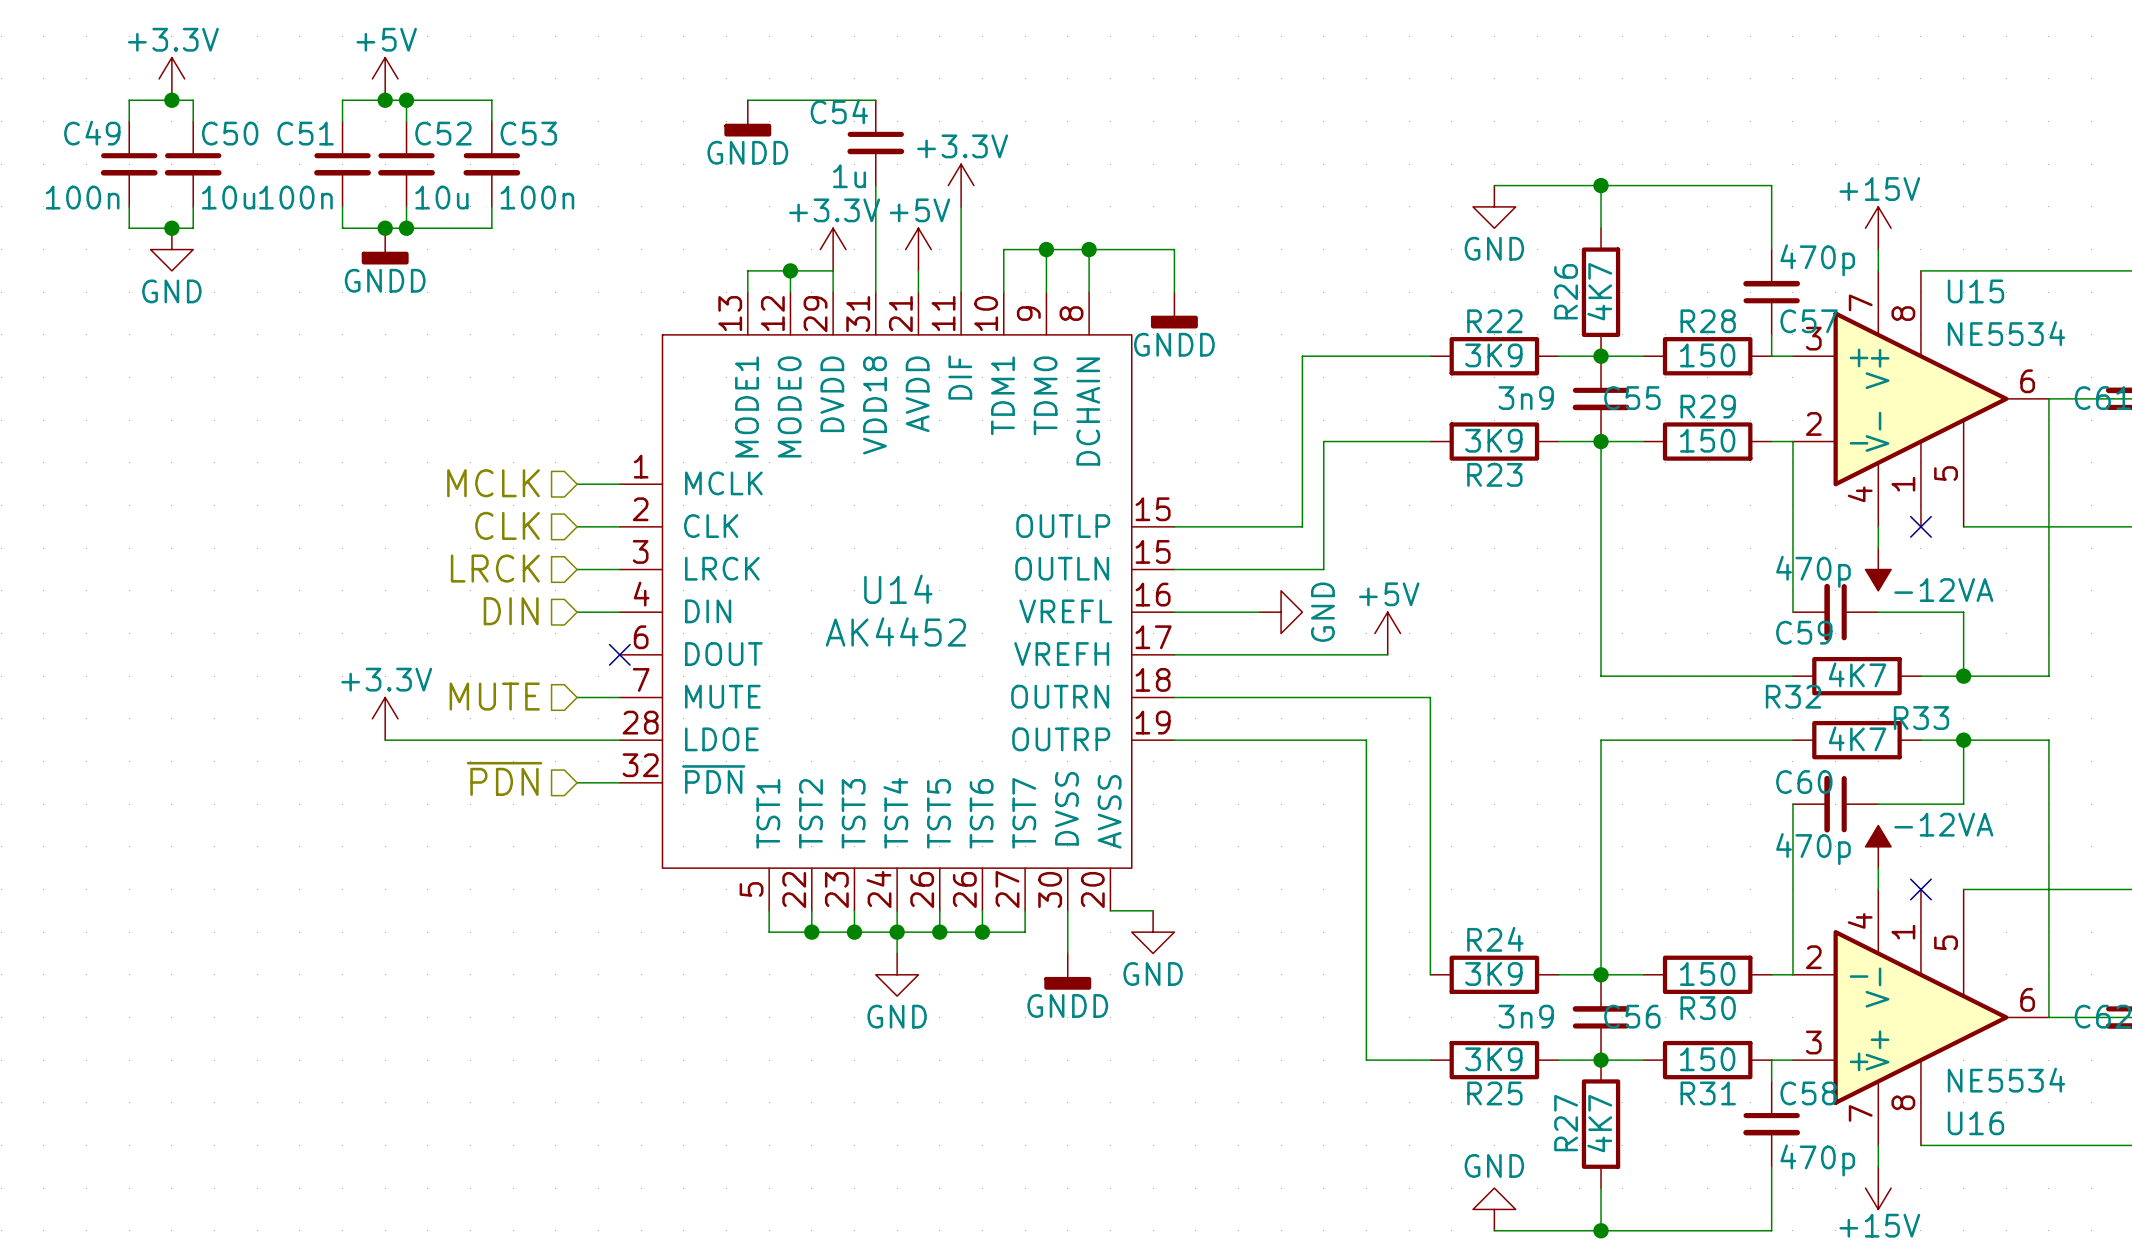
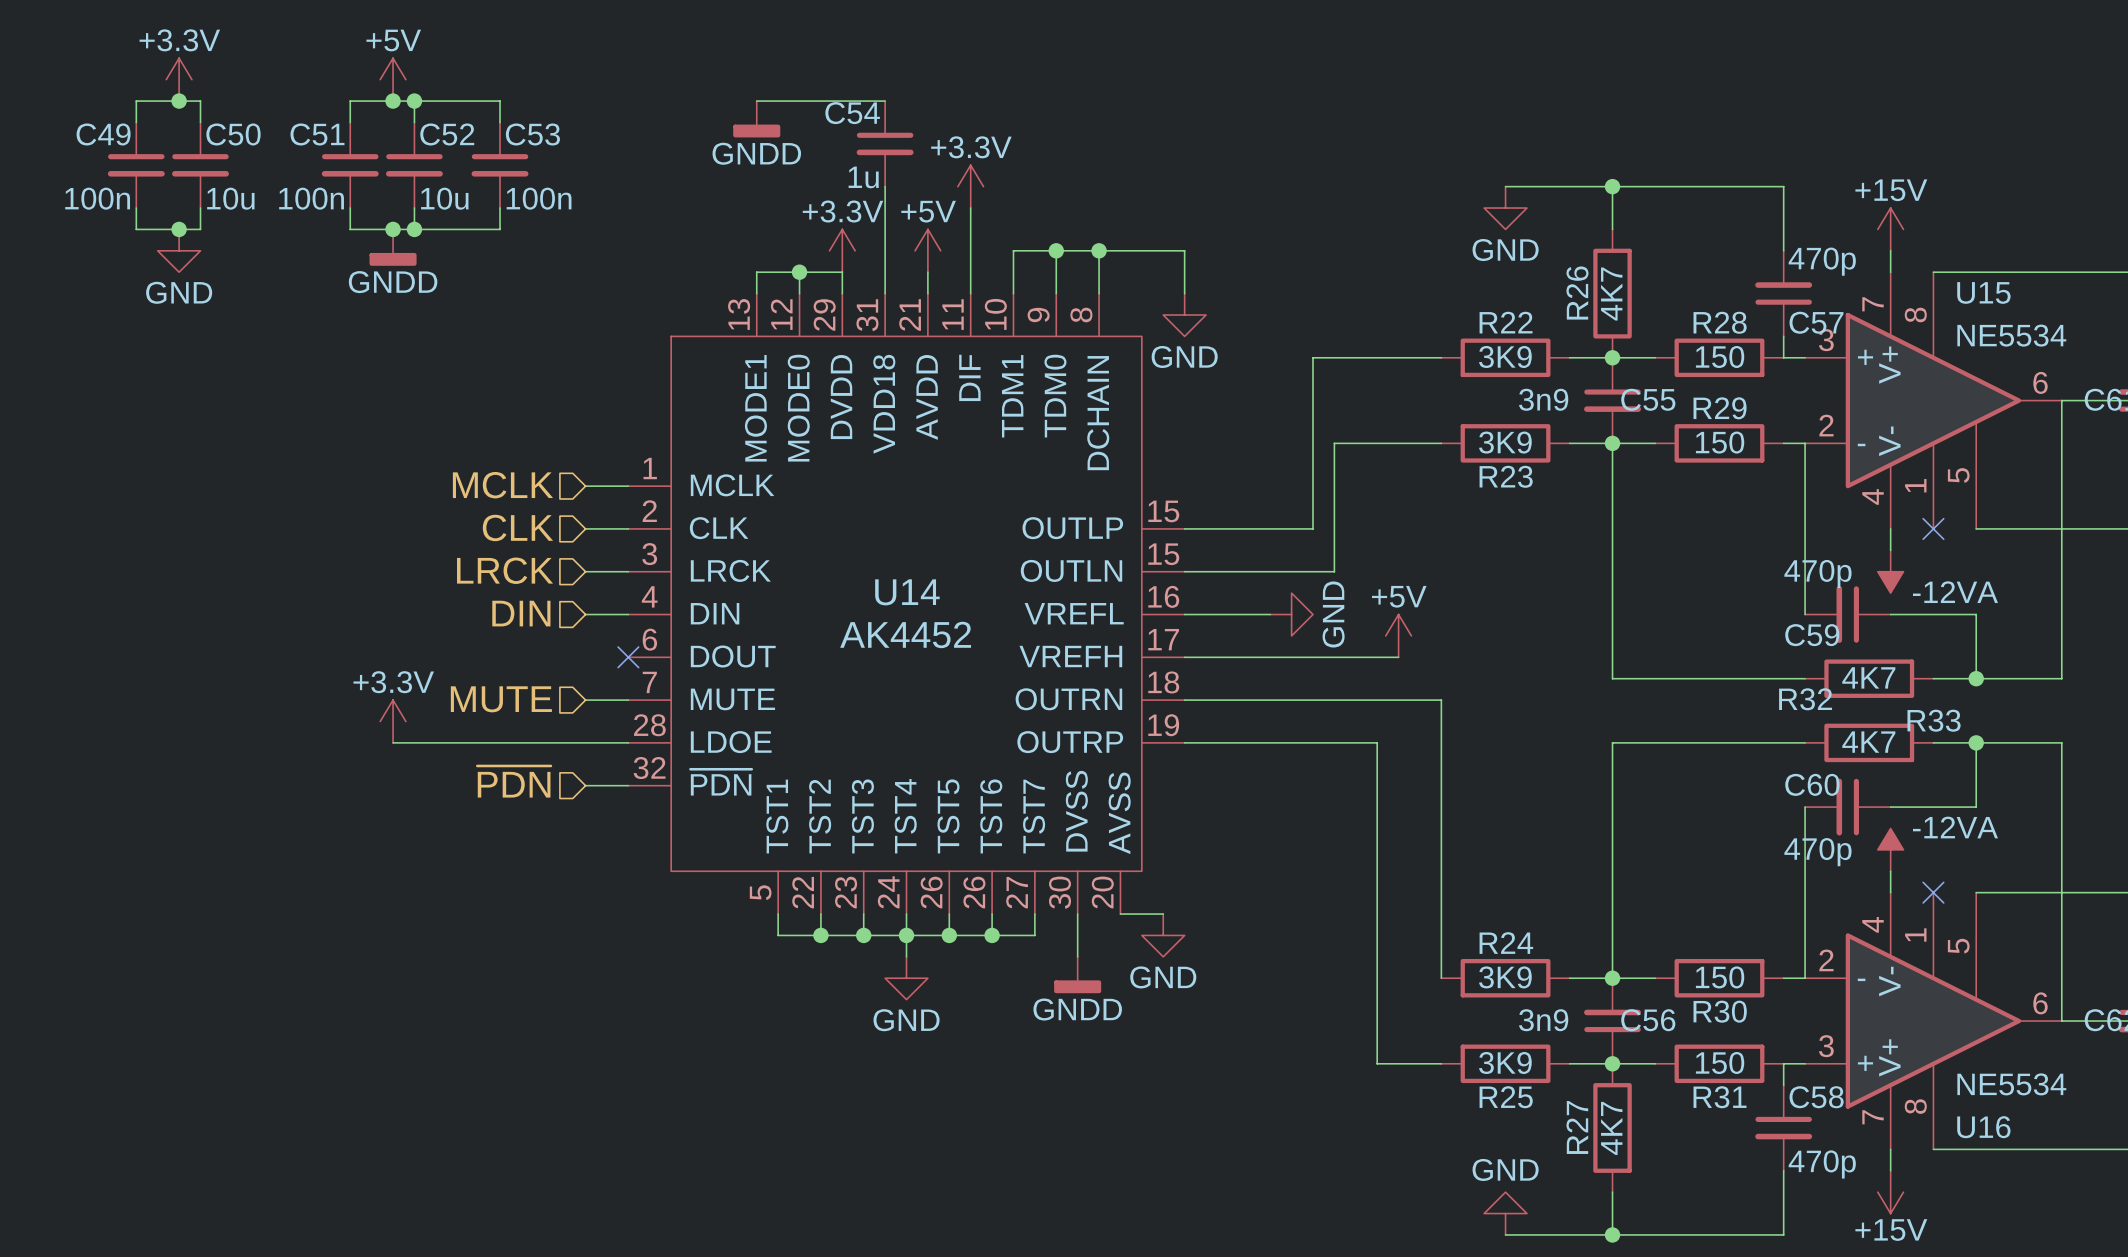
power symbol: GNDD (1174, 310) -> GND (1184, 315)

